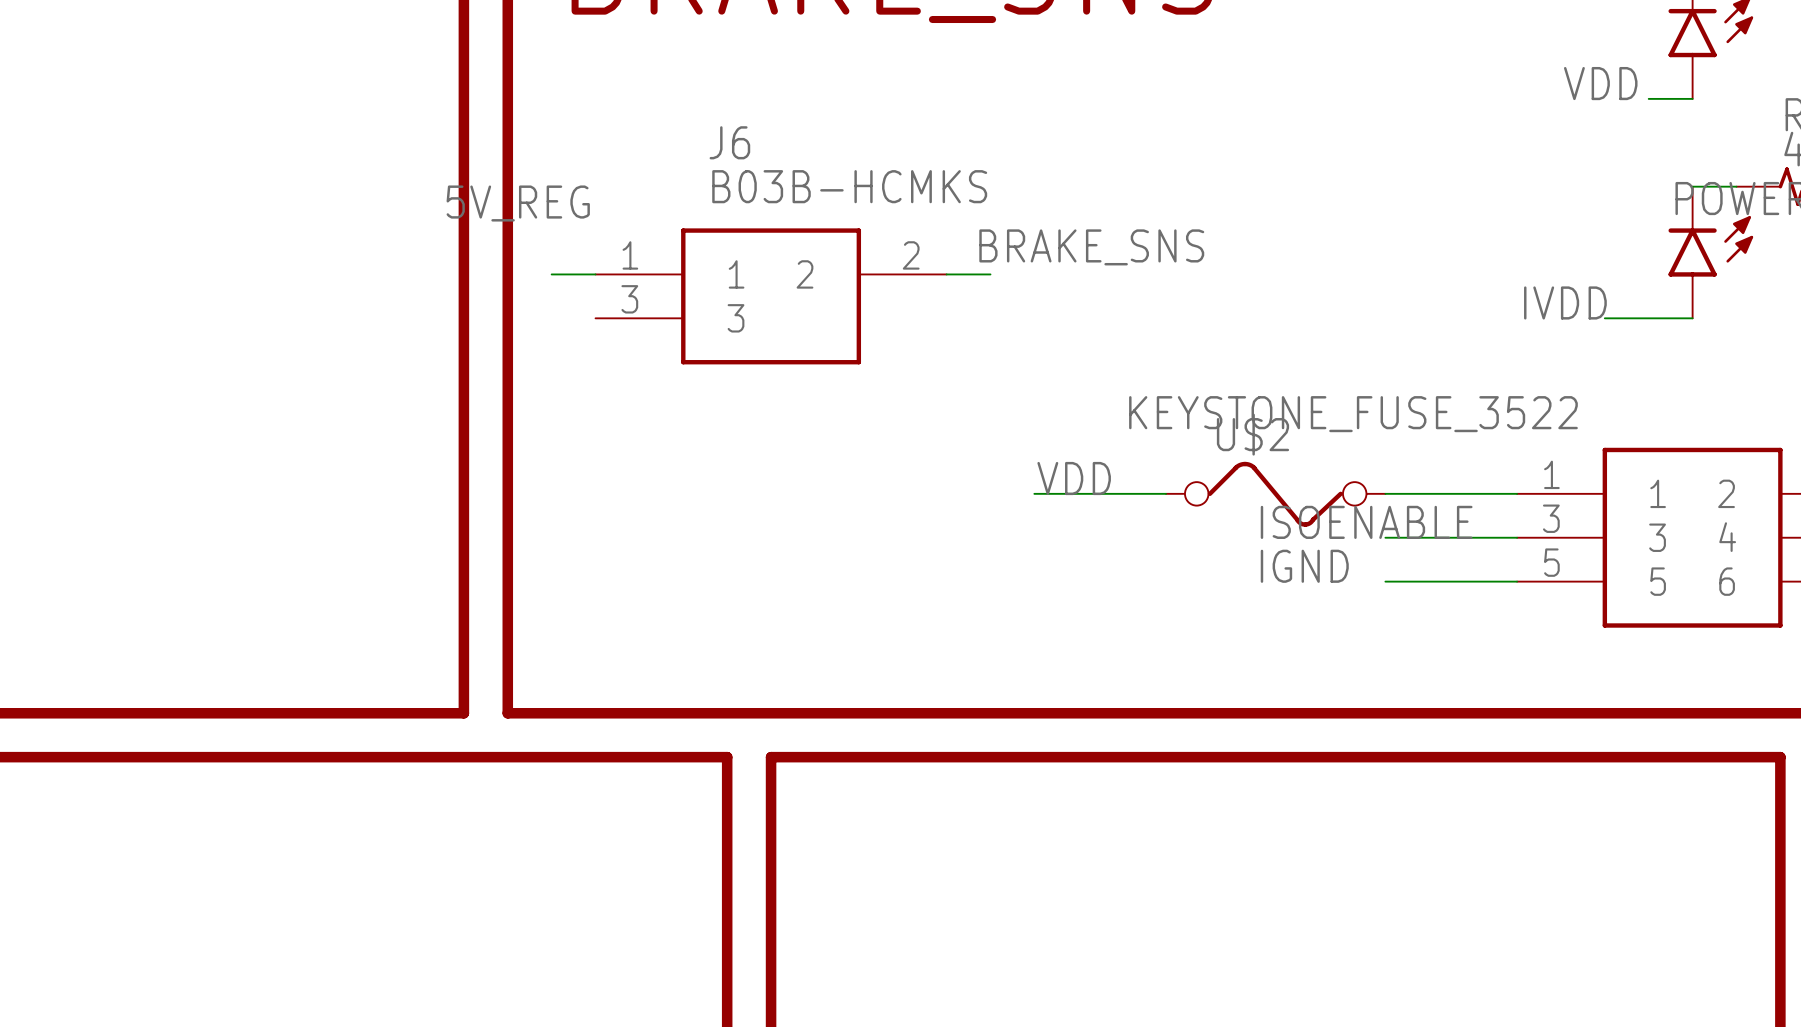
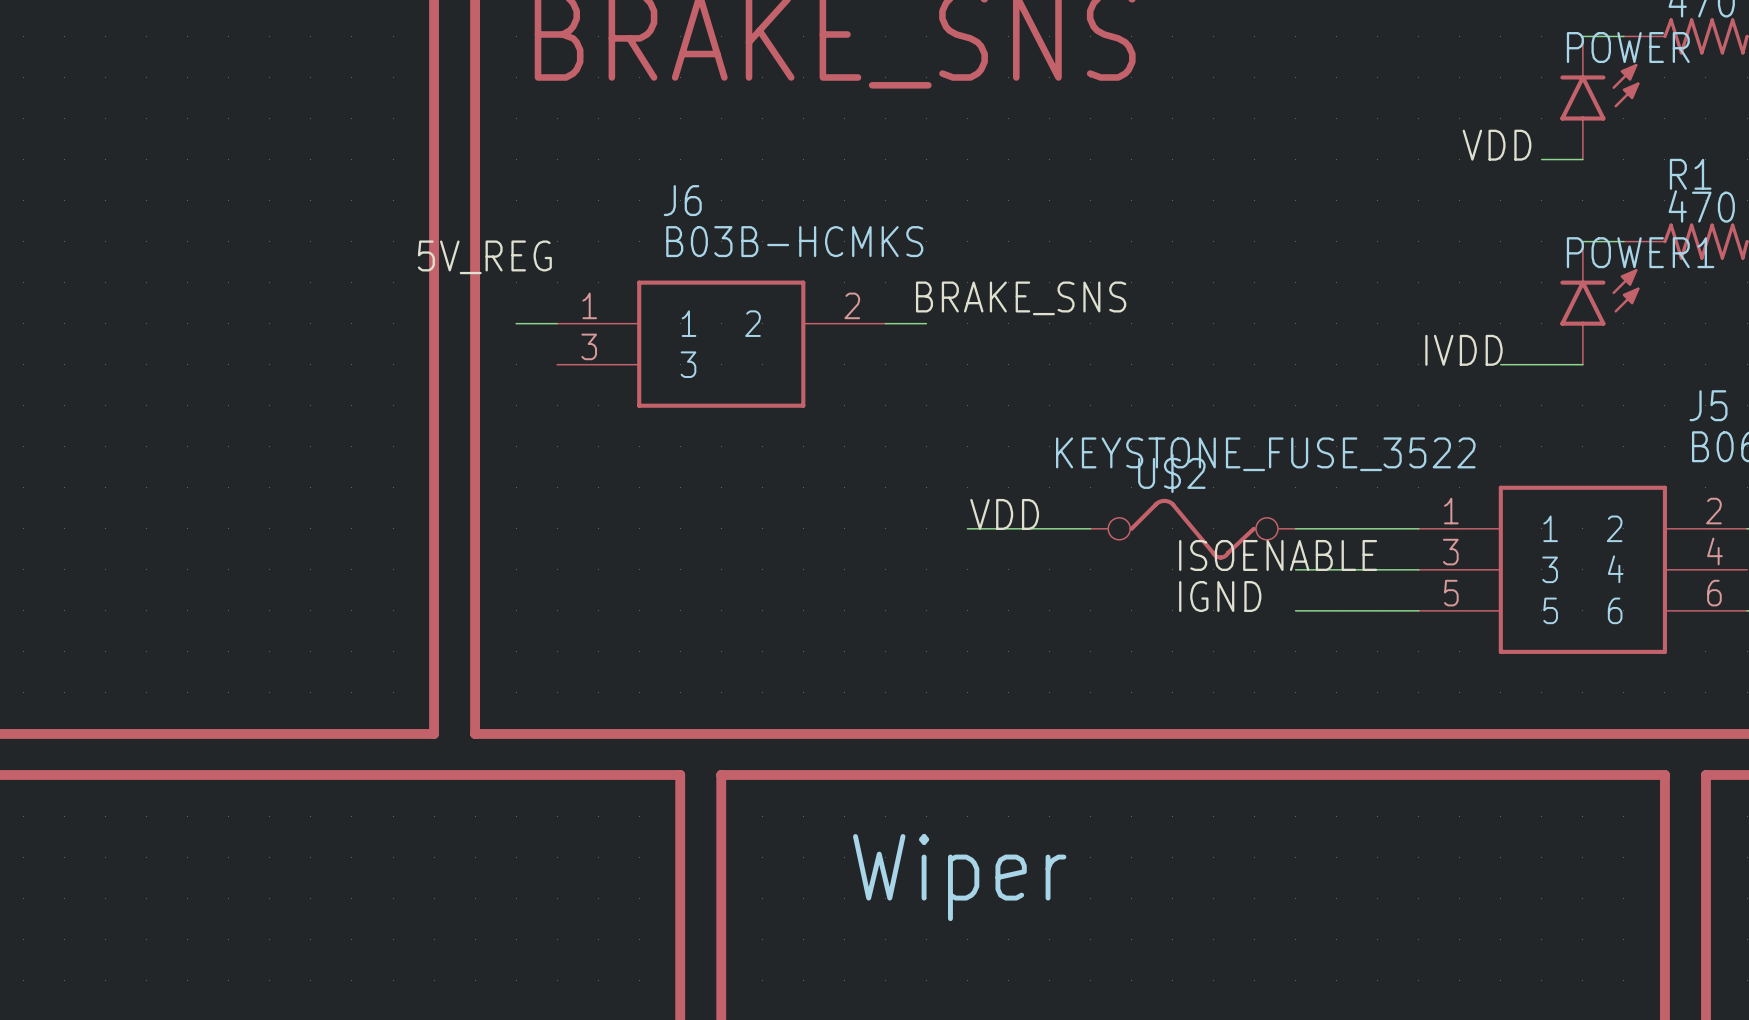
text: none -> Wiper (959, 877)

